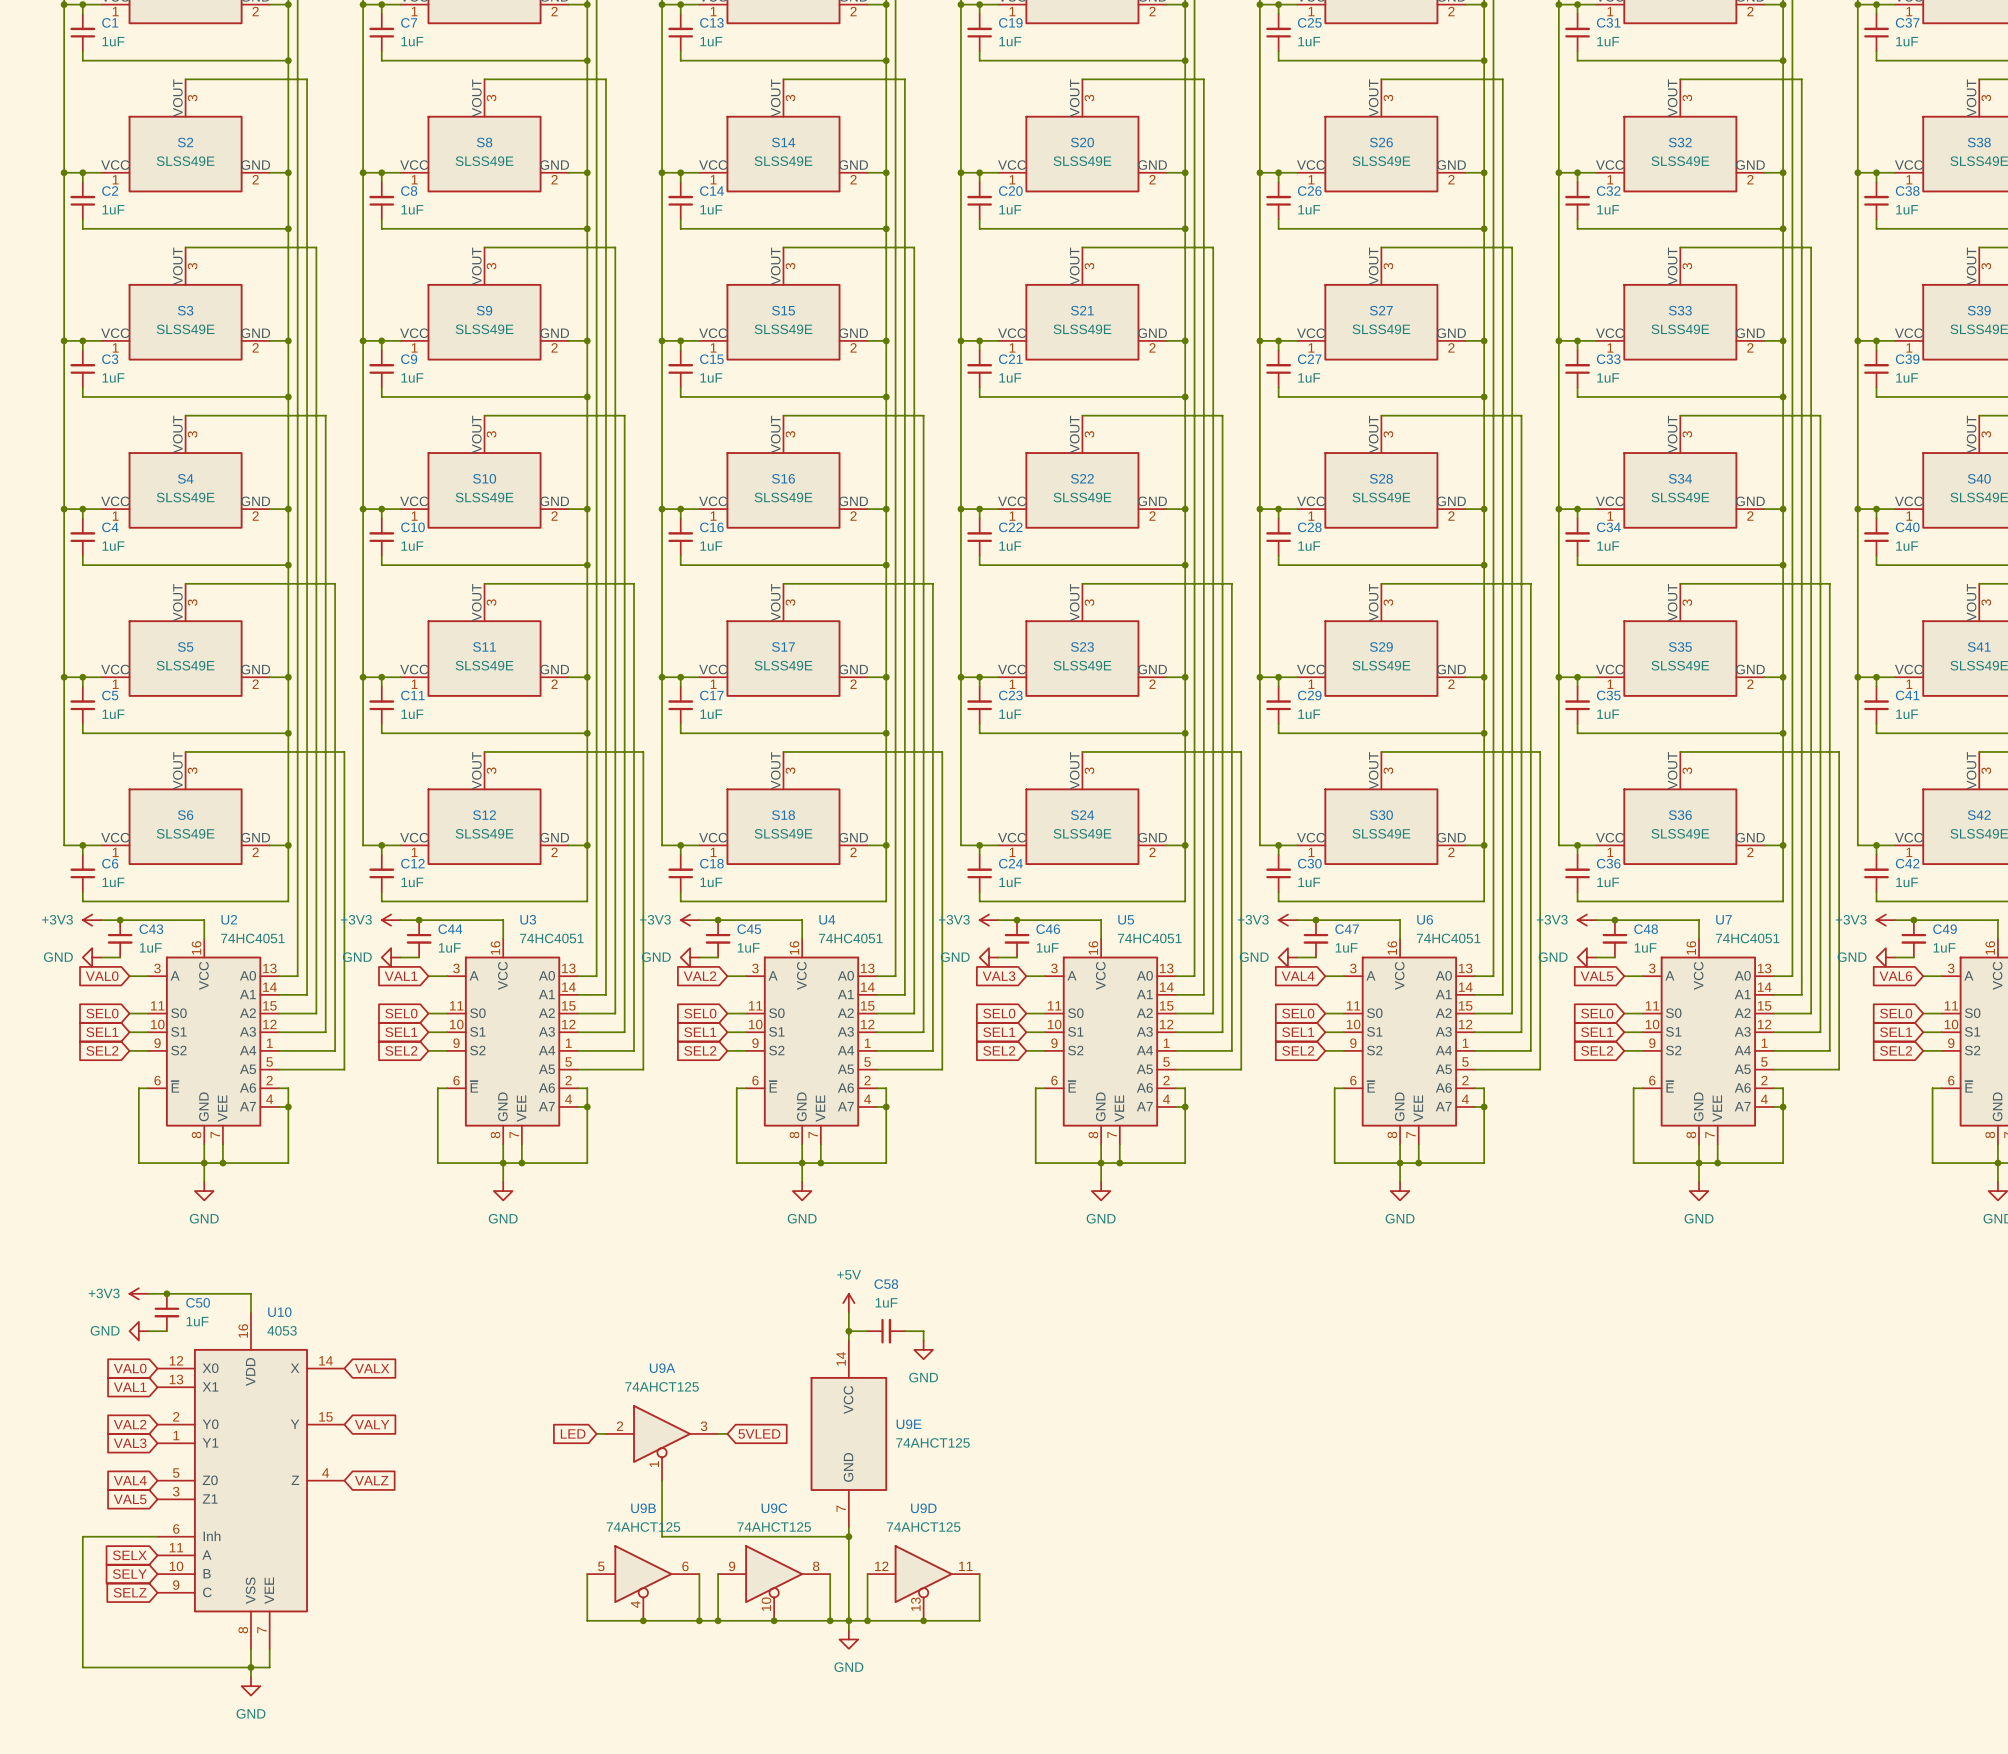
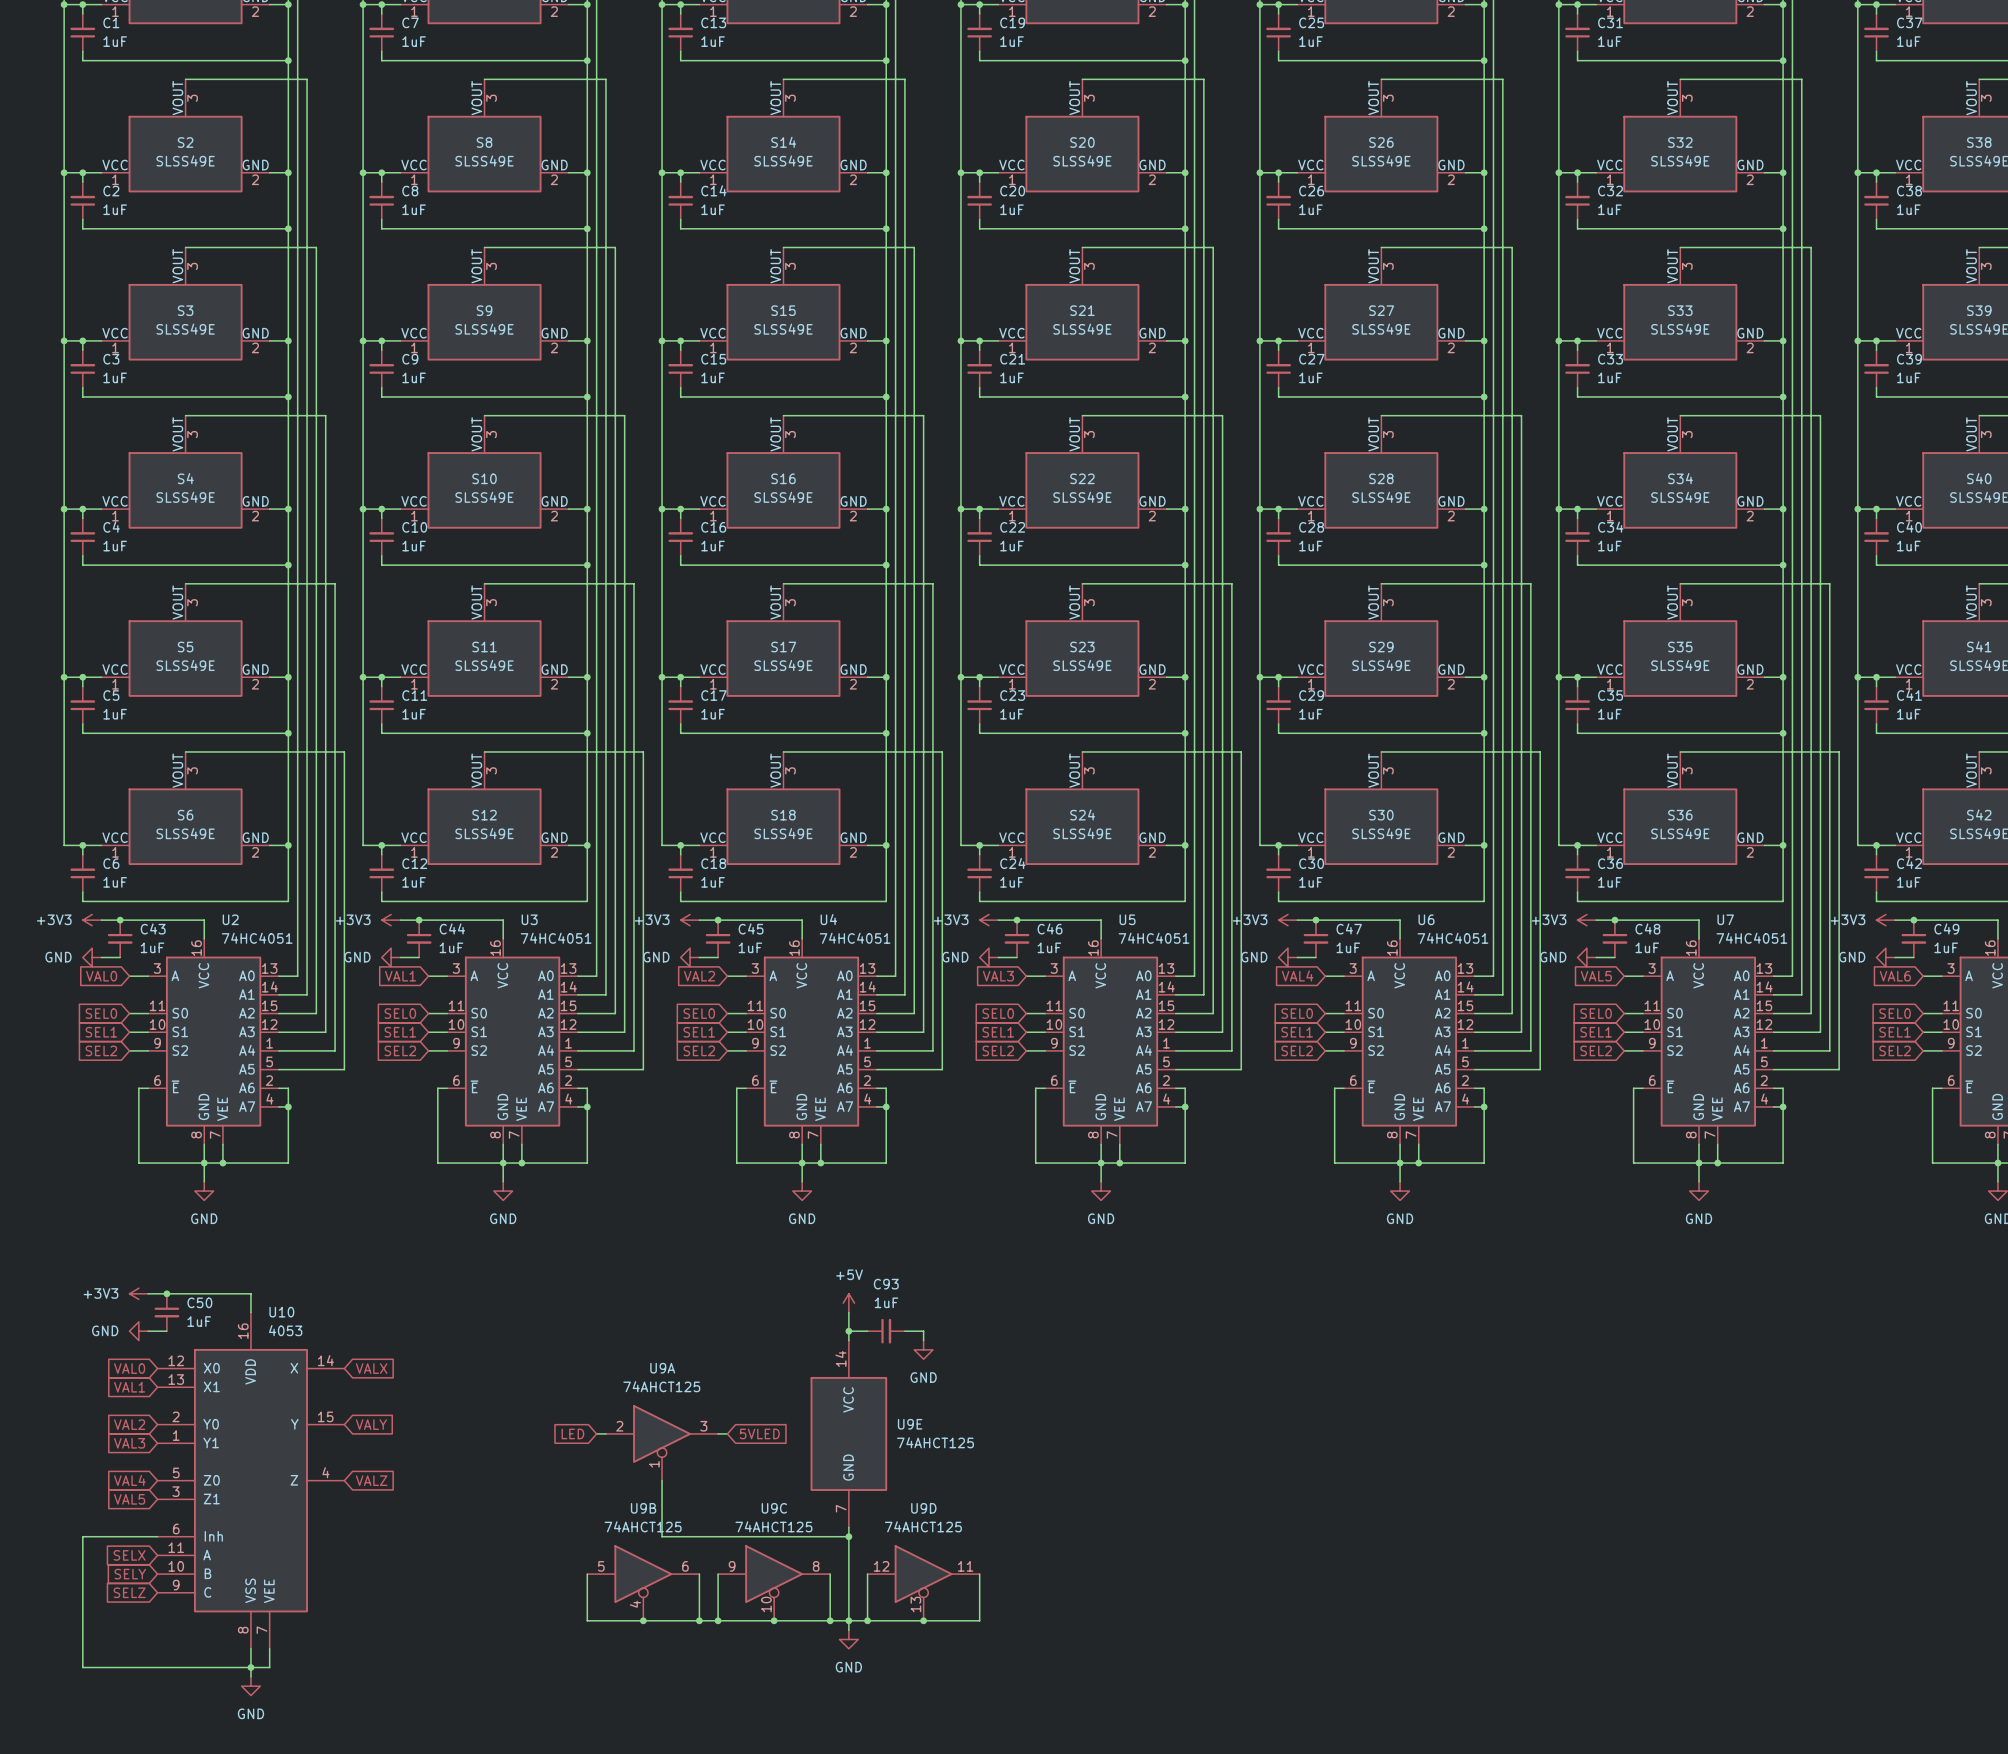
C58 name: C58 (886, 1284) -> C93 (886, 1284)

